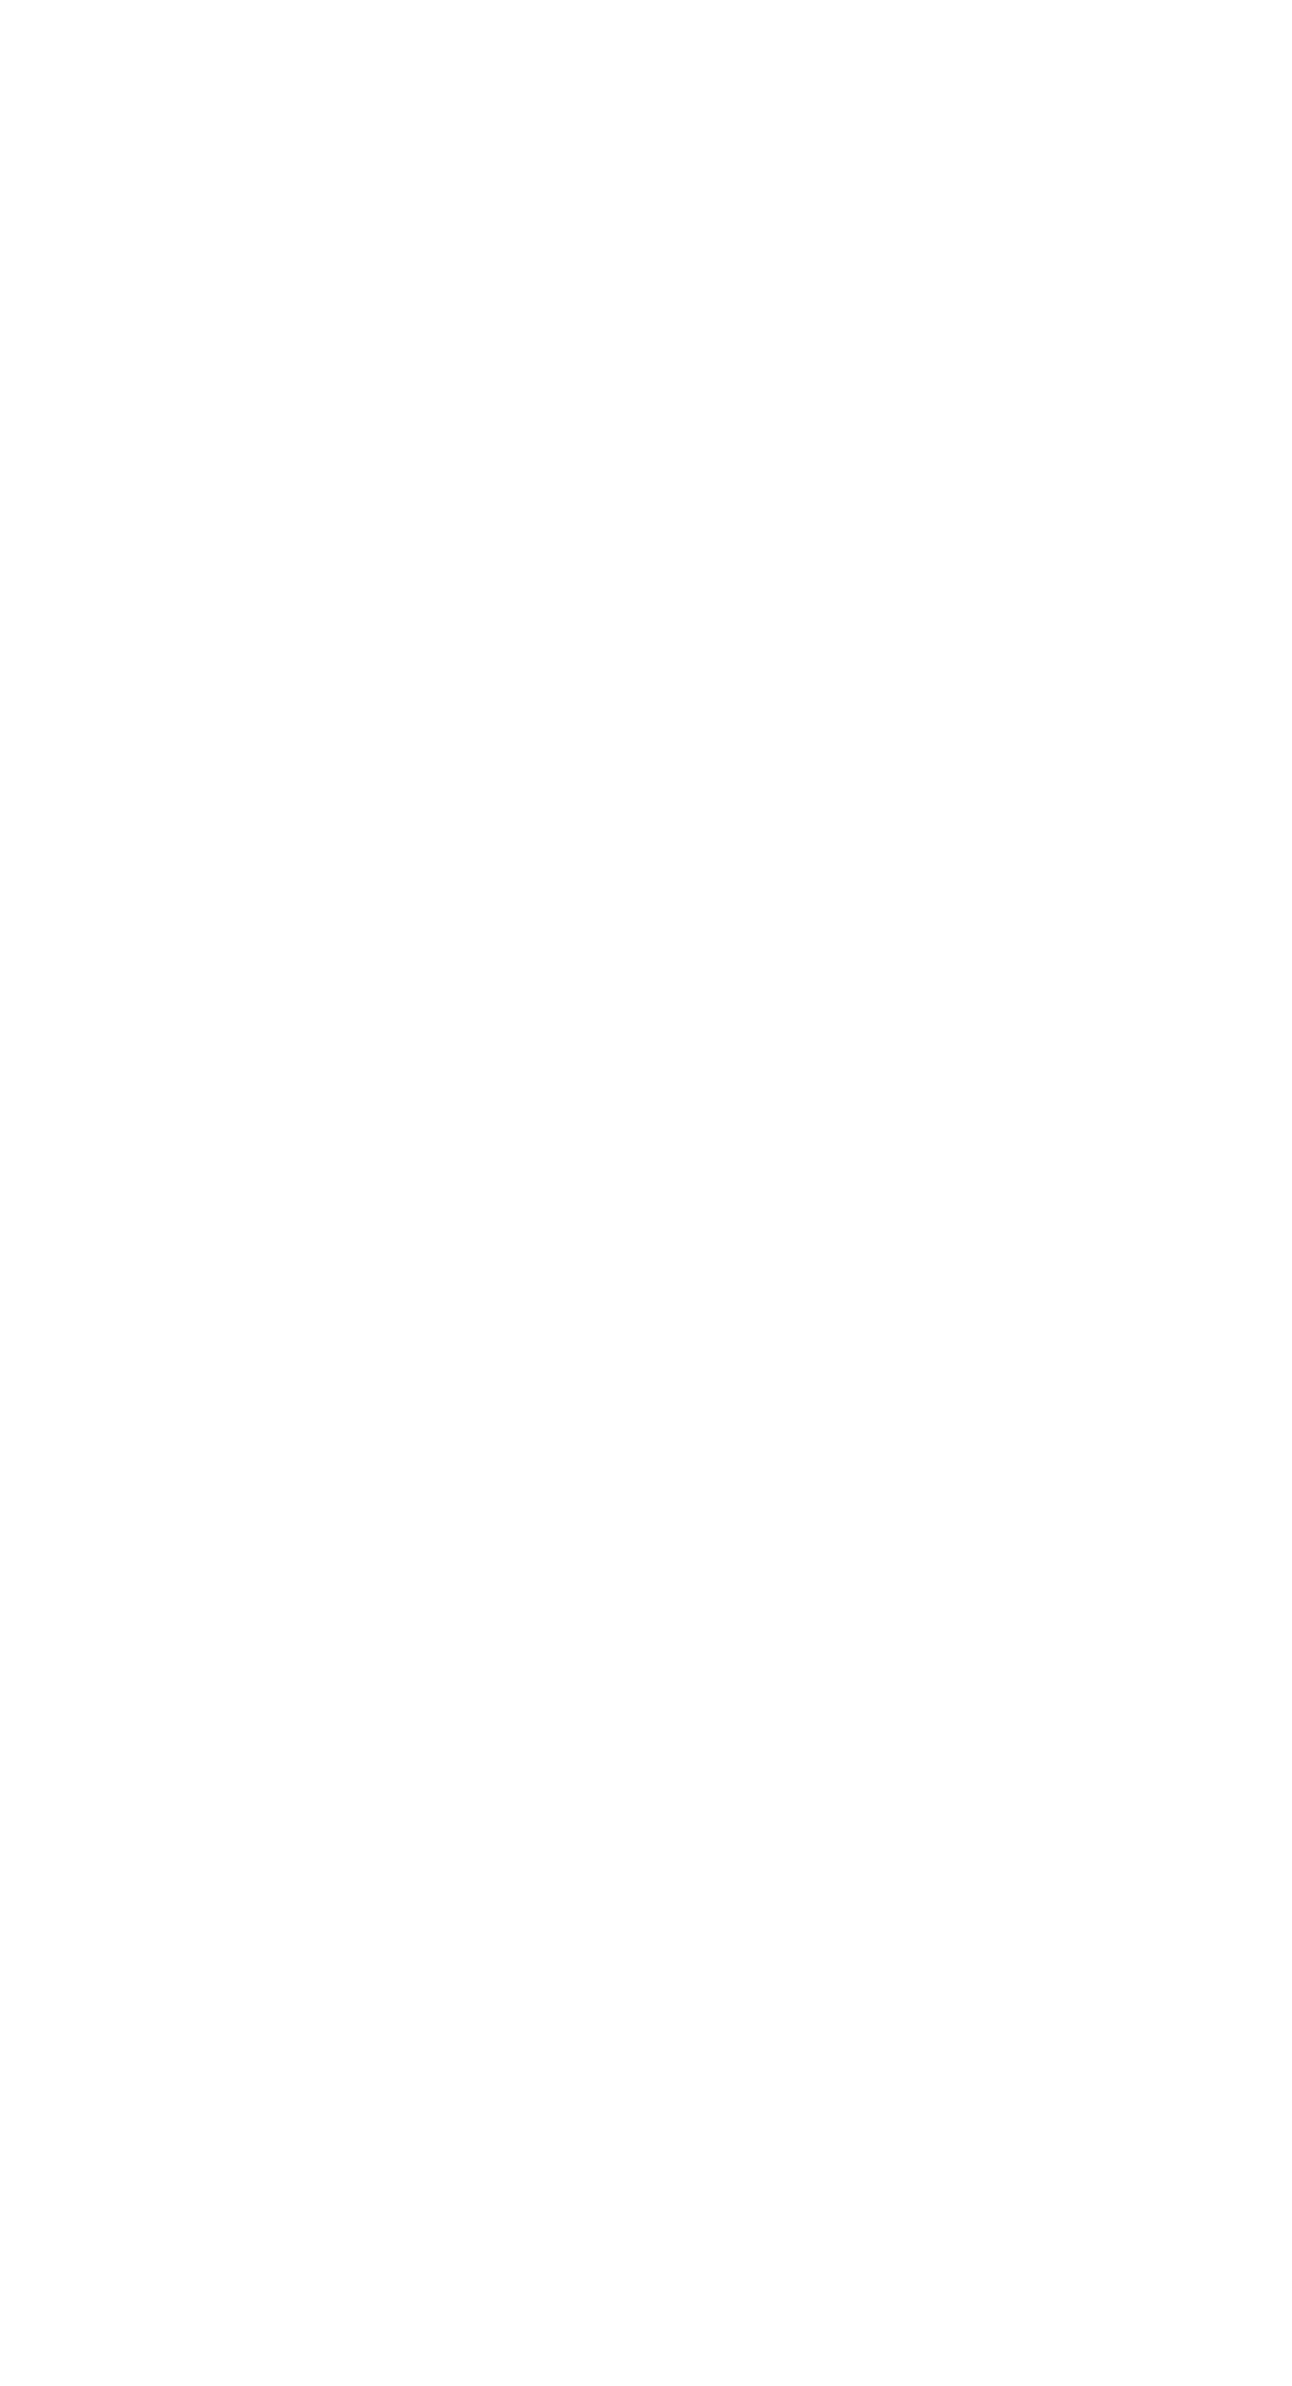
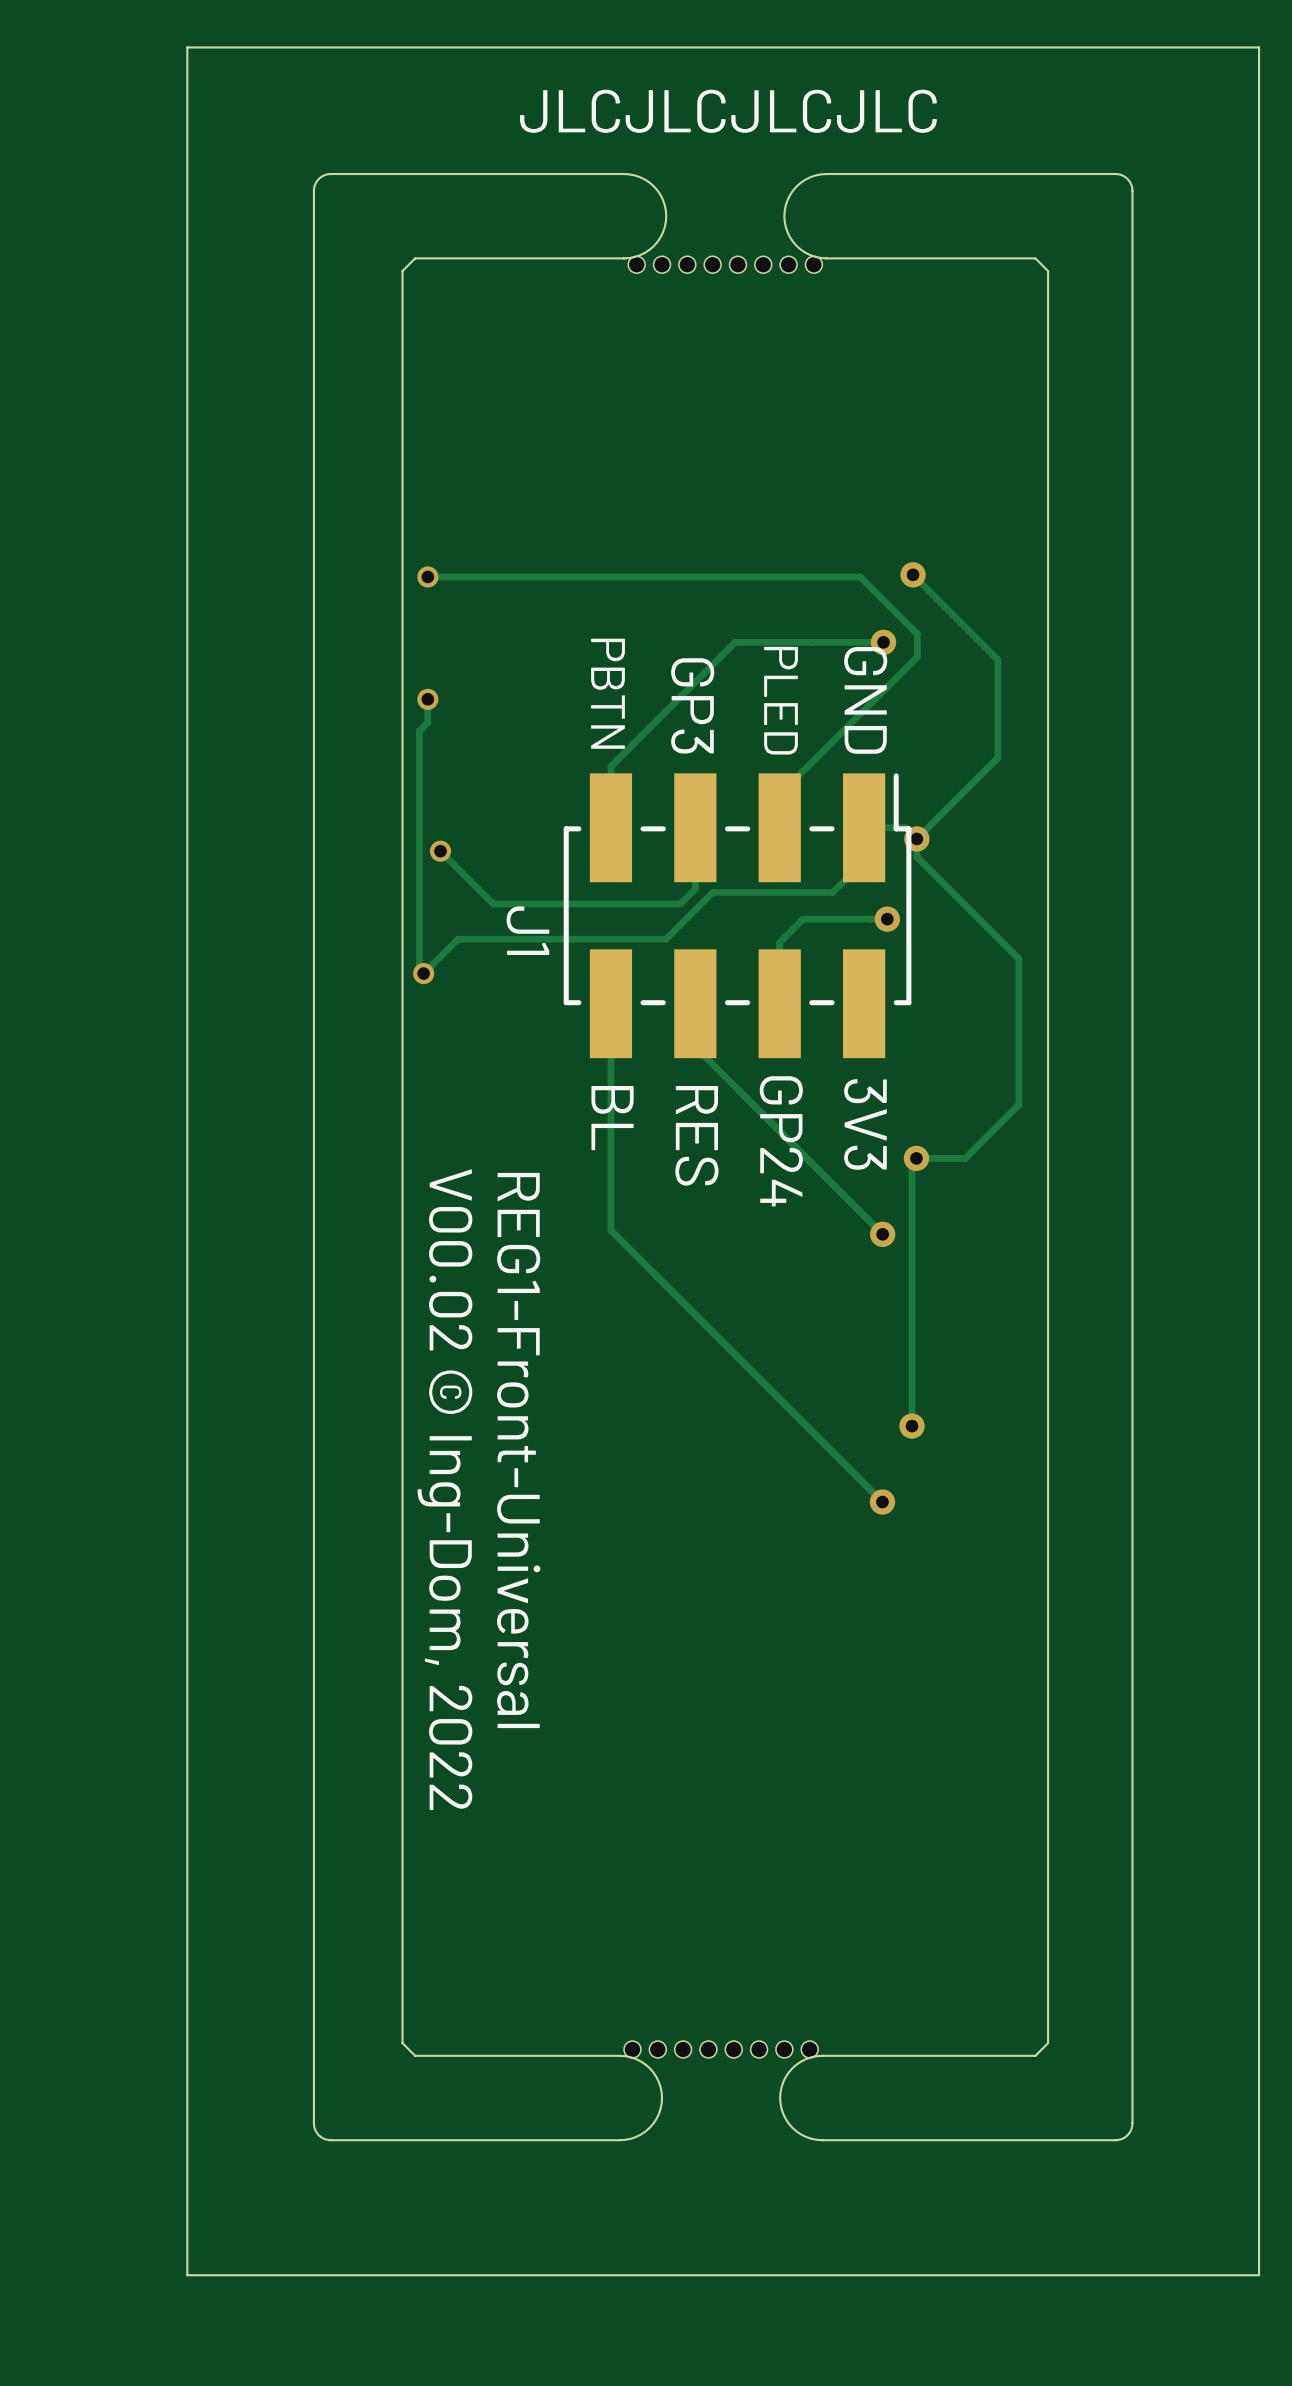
board edge: none -> (1259, 47) (1259, 2275) (187, 2275) (187, 47) (1259, 47)
text: none -> JLCJLCJLCJLC (728, 111)
board edge: none -> (624, 174) (330, 174) (318, 178) (314, 188) (313, 2123) (317, 2133) (328, 2140) (625, 2139) (640, 2134) (649, 2127) (658, 2114) (661, 2103) (660, 2087) (653, 2072) (645, 2064) (630, 2057) (415, 2055) (402, 2043) (402, 271) (415, 258) (624, 258) (640, 255) (653, 246) (663, 232) (666, 216) (664, 205) (657, 190) (649, 182) (640, 177) (624, 174)
board edge: none -> (1115, 174) (821, 174) (810, 177) (796, 186) (787, 200) (784, 210) (785, 227) (793, 241) (800, 249) (815, 256) (1035, 258) (1048, 271) (1048, 2043) (1035, 2055) (822, 2055) (806, 2059) (796, 2064) (785, 2076) (780, 2092) (780, 2103) (783, 2114) (792, 2127) (801, 2134) (816, 2139) (1115, 2140) (1125, 2136) (1132, 2125) (1132, 190) (1127, 178) (1115, 174)
part: none -> (725, 264)
track: none -> (913, 574) (997, 659) (997, 757) (916, 838)
via: none -> (913, 574)
track: none -> (427, 576) (860, 576) (917, 633) (917, 656) (779, 794) (779, 827)
via: none -> (427, 576)
track: none -> (883, 642) (735, 642) (610, 766) (610, 827)
via: none -> (883, 642)
text: none -> PBTN (608, 693)
track: none -> (427, 699) (427, 722) (419, 730) (419, 969) (425, 975)
via: none -> (427, 699)
text: none -> PLED (781, 700)
text: none -> GP3 (692, 705)
text: none -> GND (865, 700)
track: none -> (695, 827) (695, 888) (680, 903) (493, 903) (440, 851)
track: none -> (916, 838) (916, 856) (1018, 958) (1018, 1104) (965, 1158) (916, 1158) (912, 1162) (912, 1426)
track: none -> (916, 838) (905, 827) (864, 827) (864, 861) (832, 892) (712, 892) (666, 939) (458, 939) (423, 973)
via: none -> (916, 838)
via: none -> (440, 851)
J1: none -> (737, 915)
track: none -> (887, 919) (803, 919) (779, 942) (779, 1003)
via: none -> (887, 919)
via: none -> (423, 973)
track: none -> (610, 1003) (610, 1230) (882, 1502)
track: none -> (695, 1003) (695, 1046) (882, 1234)
text: none -> BL (612, 1118)
text: none -> 3V3 (865, 1124)
text: none -> RES (696, 1135)
text: none -> GP24 (781, 1141)
via: none -> (916, 1158)
via: none -> (882, 1234)
via: none -> (912, 1426)
via: none -> (882, 1502)
text: none -> REG1-Front-Universal (518, 1450)
text: none -> V00.02 © Ing-Dom, 2022 (445, 1489)
part: none -> (721, 2049)

